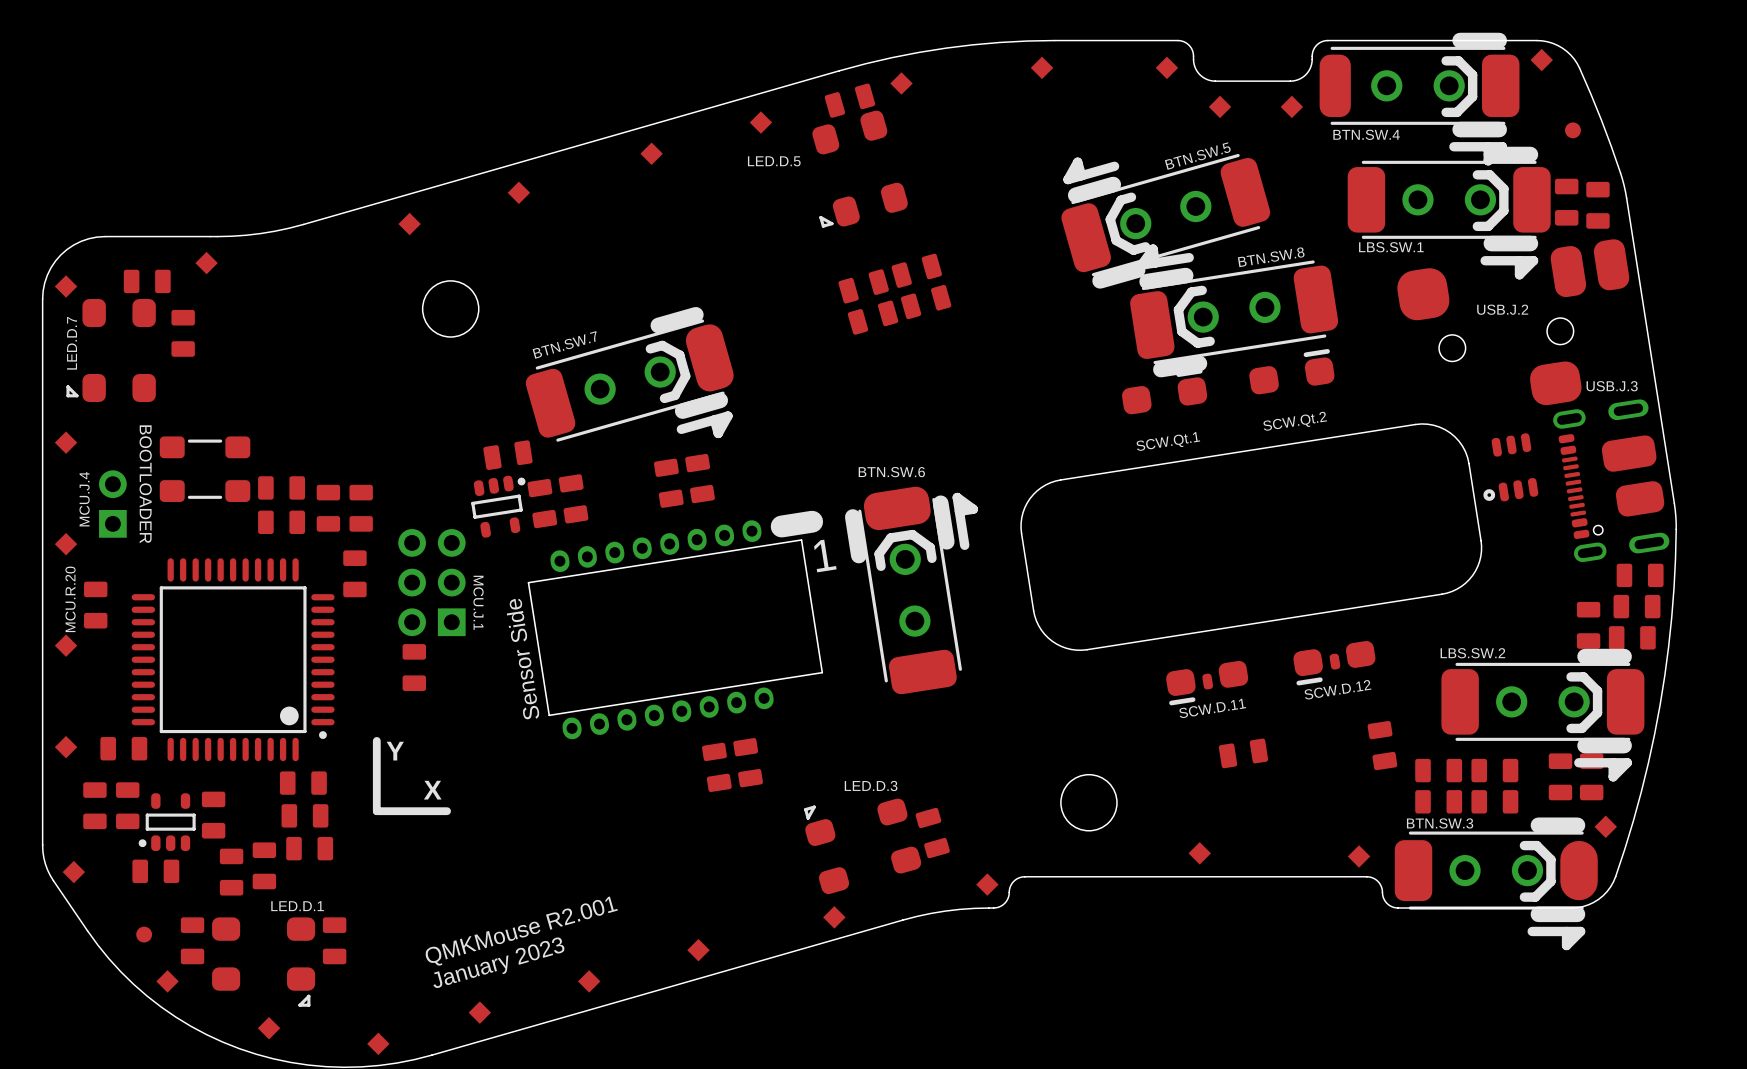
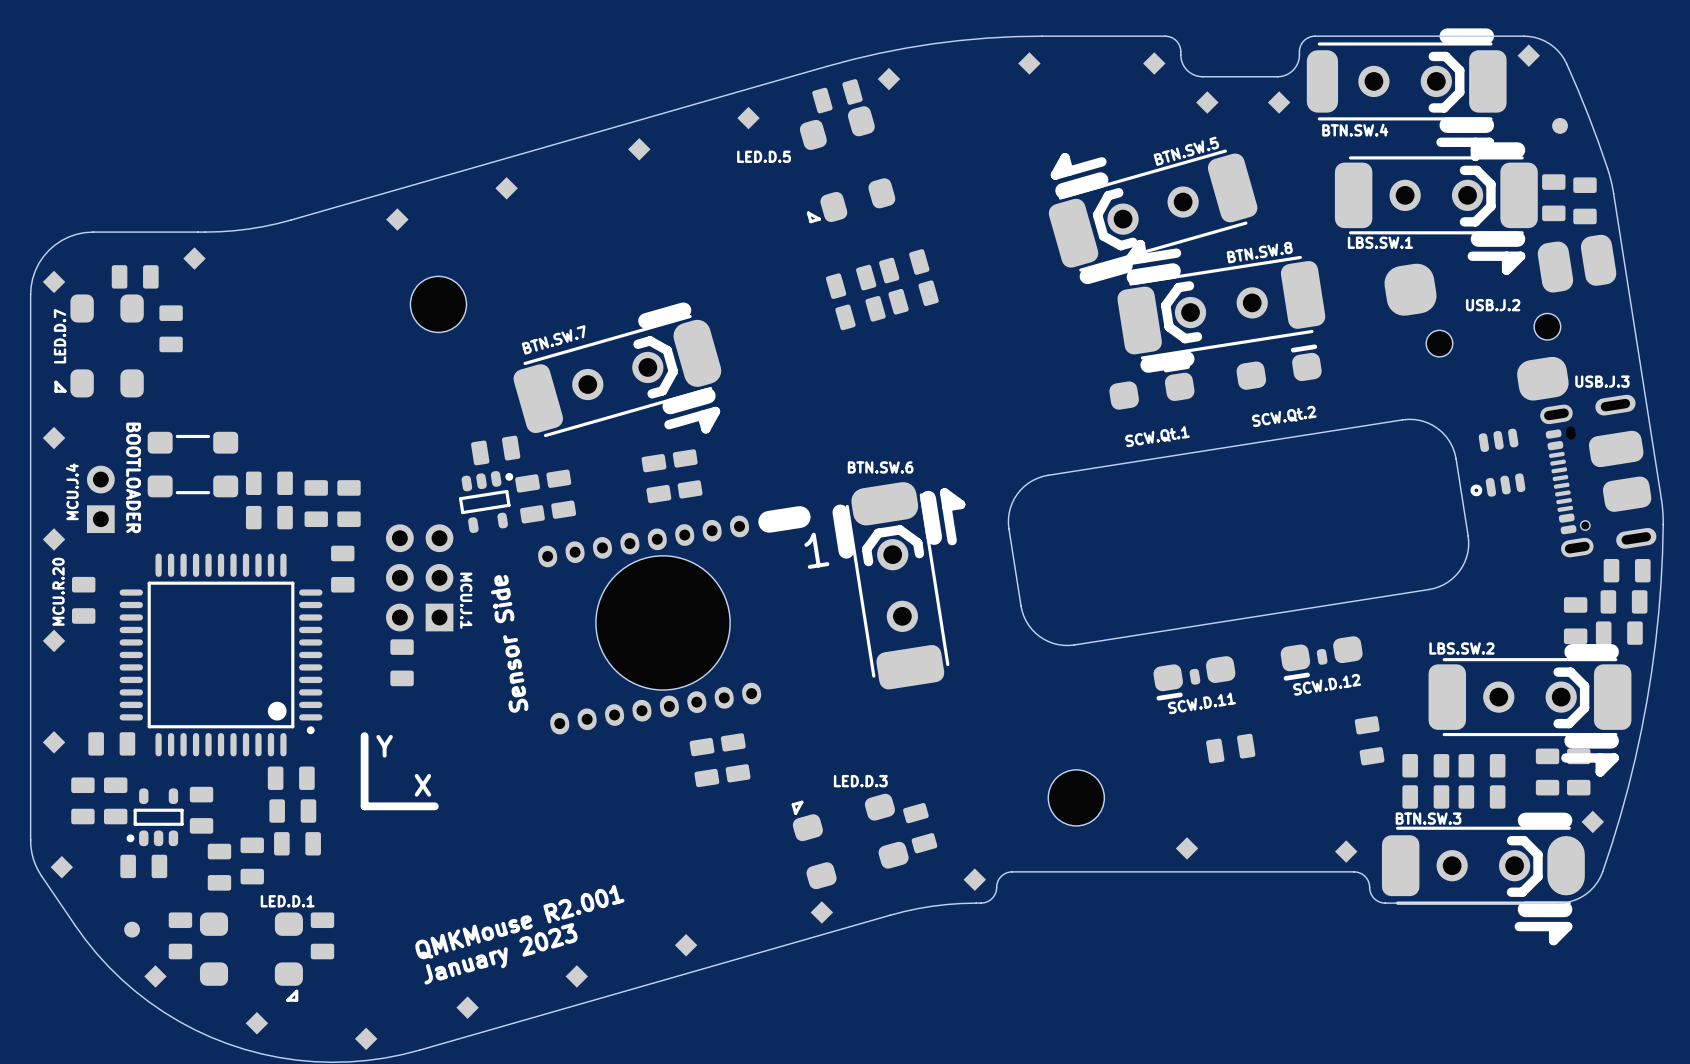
part footprint: [527, 510, 824, 740] -> [538, 506, 811, 735]

